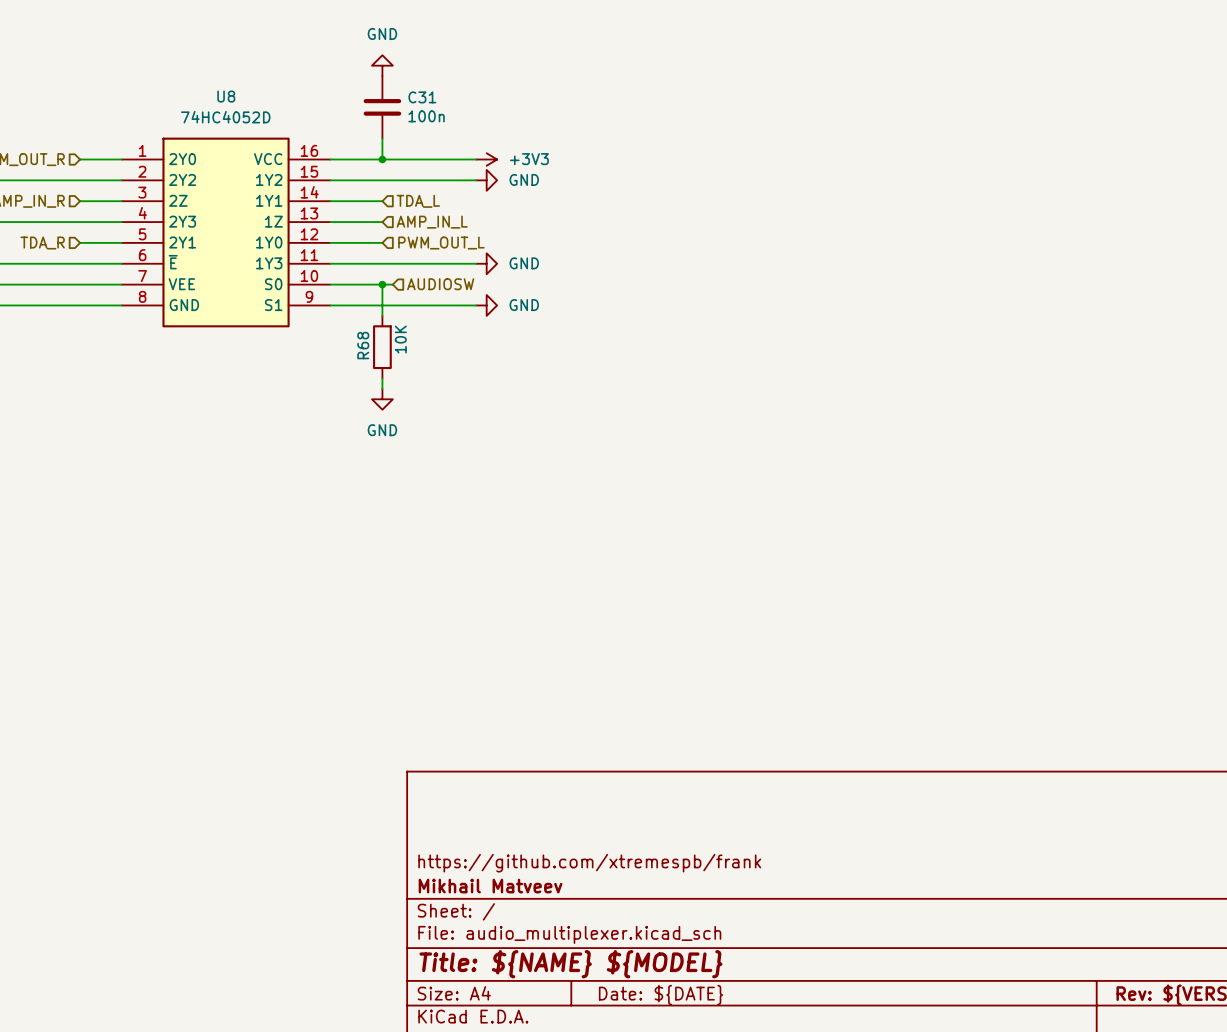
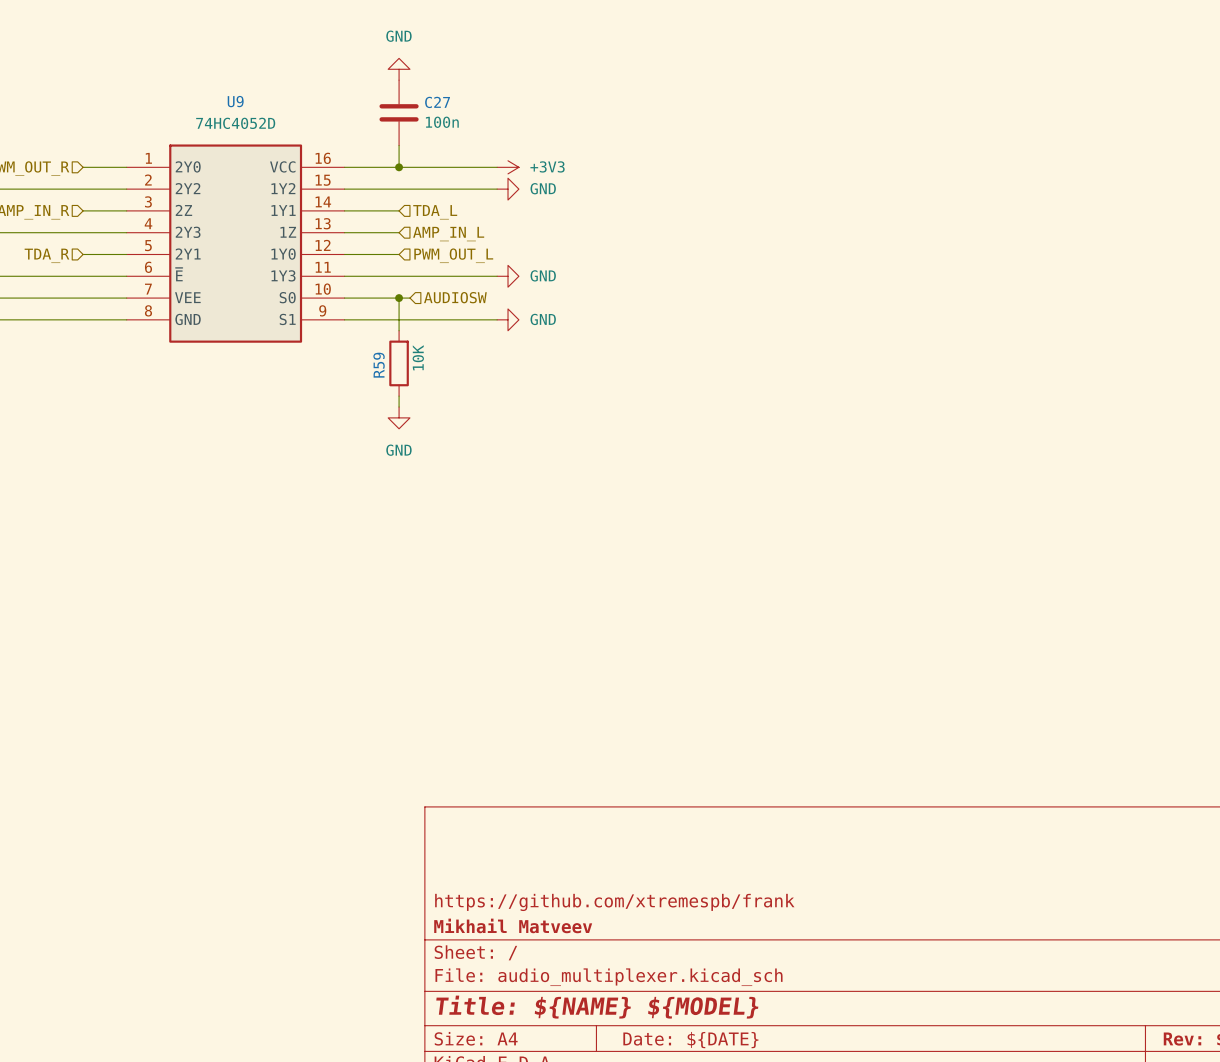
U8 name: U8 (226, 96) -> U9 (235, 101)
C31 name: C31 (422, 97) -> C27 (437, 102)
R68 name: R68 (363, 345) -> R59 (379, 365)

